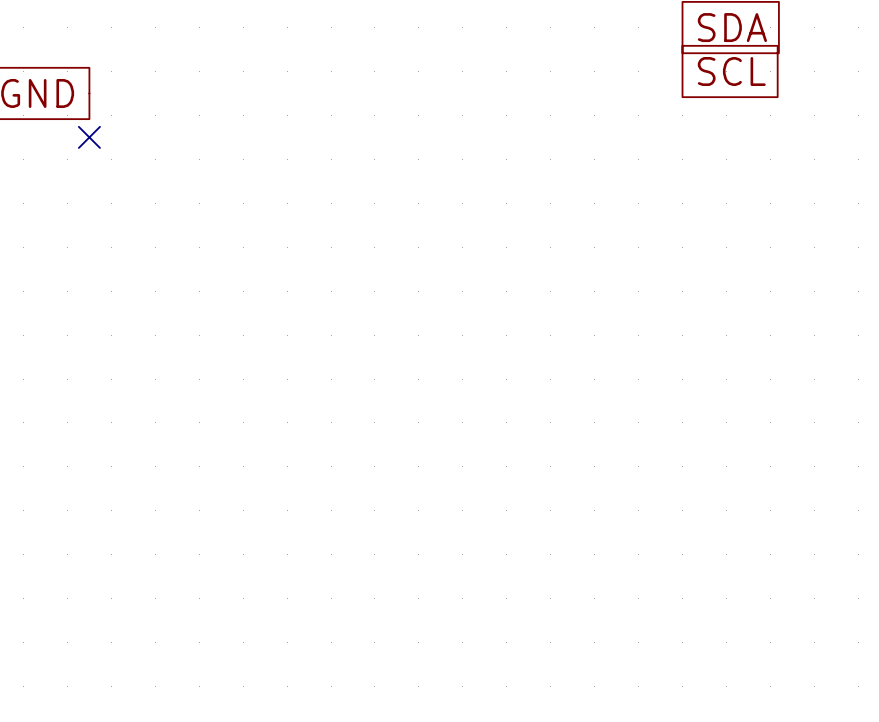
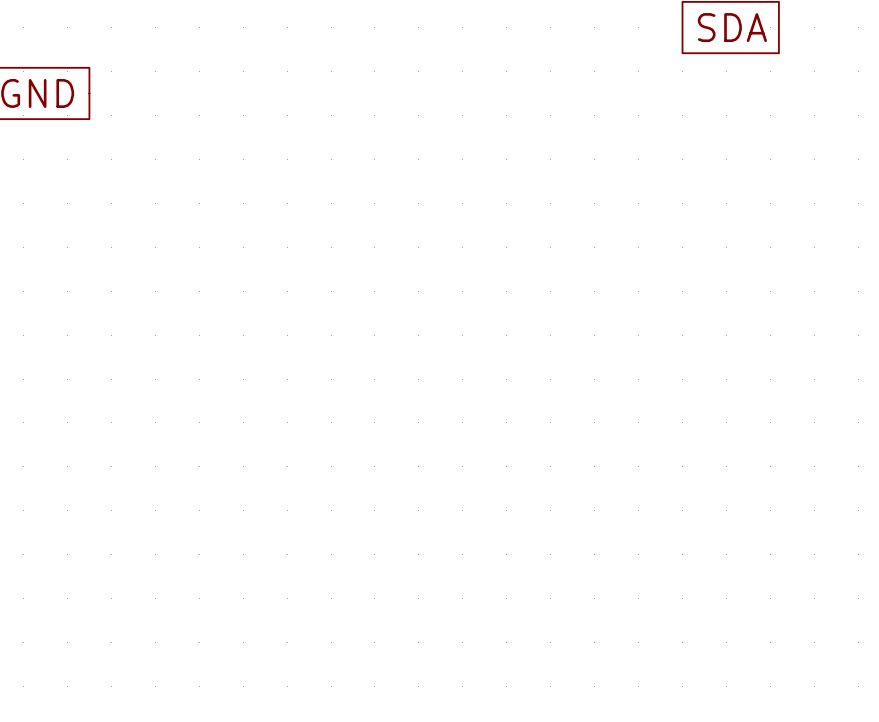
global label: SCL (731, 71) -> none
no-connect mark: (89, 137) -> none

